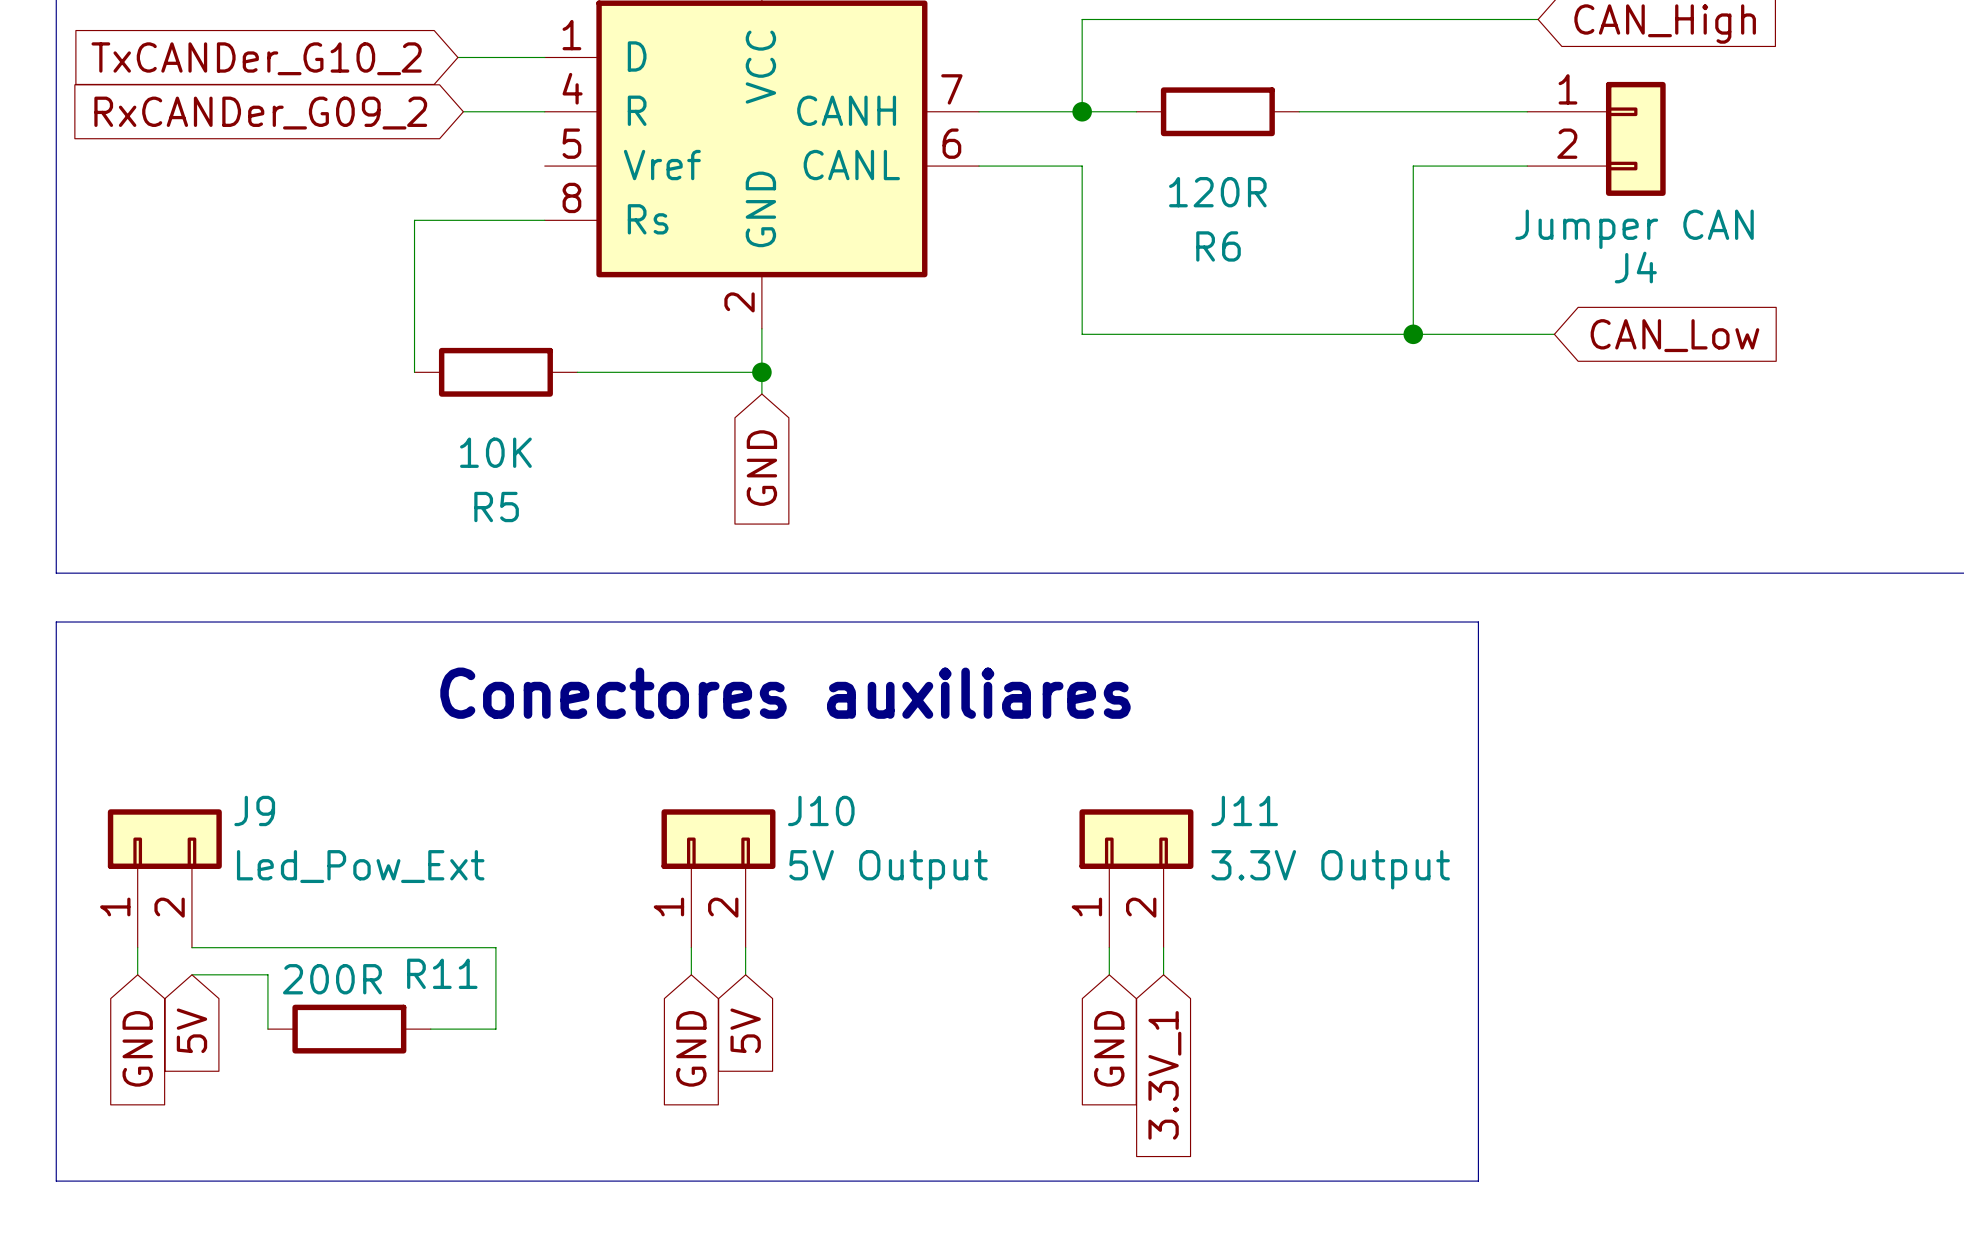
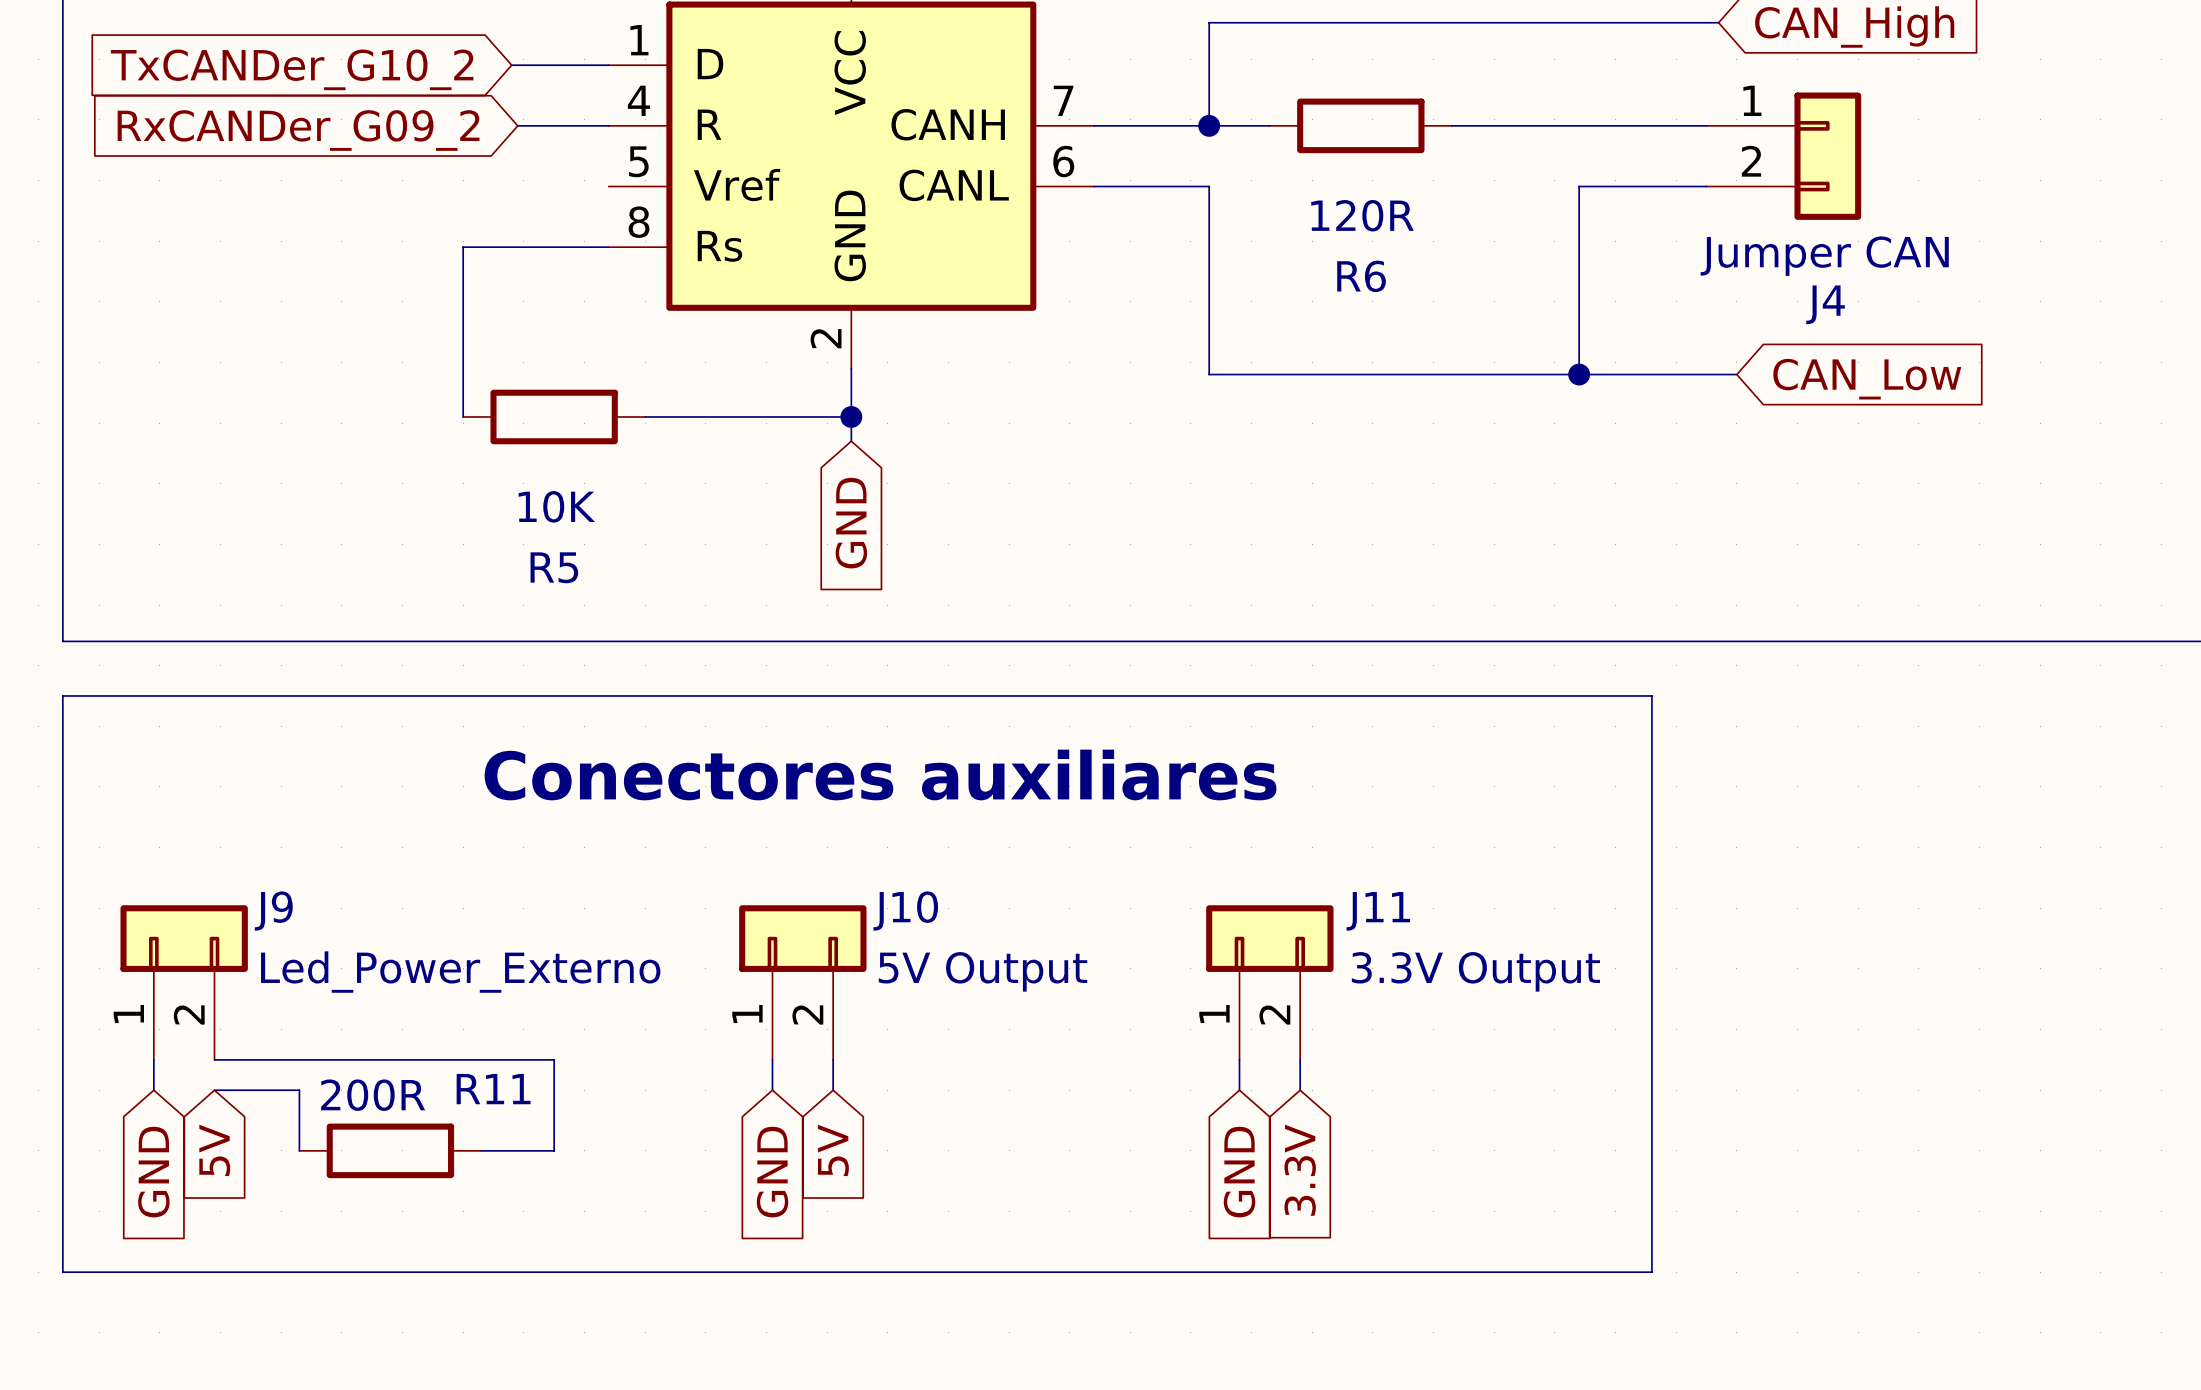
J9 value: Led_Pow_Ext (360, 866) -> Led_Power_Externo (460, 972)
global label: 3.3V_1 (1164, 1075) -> 3.3V (1300, 1170)
line: (56, 1137) (56, 1181) (1478, 1181) (1478, 1137) -> (62, 1272) (1651, 1272)

